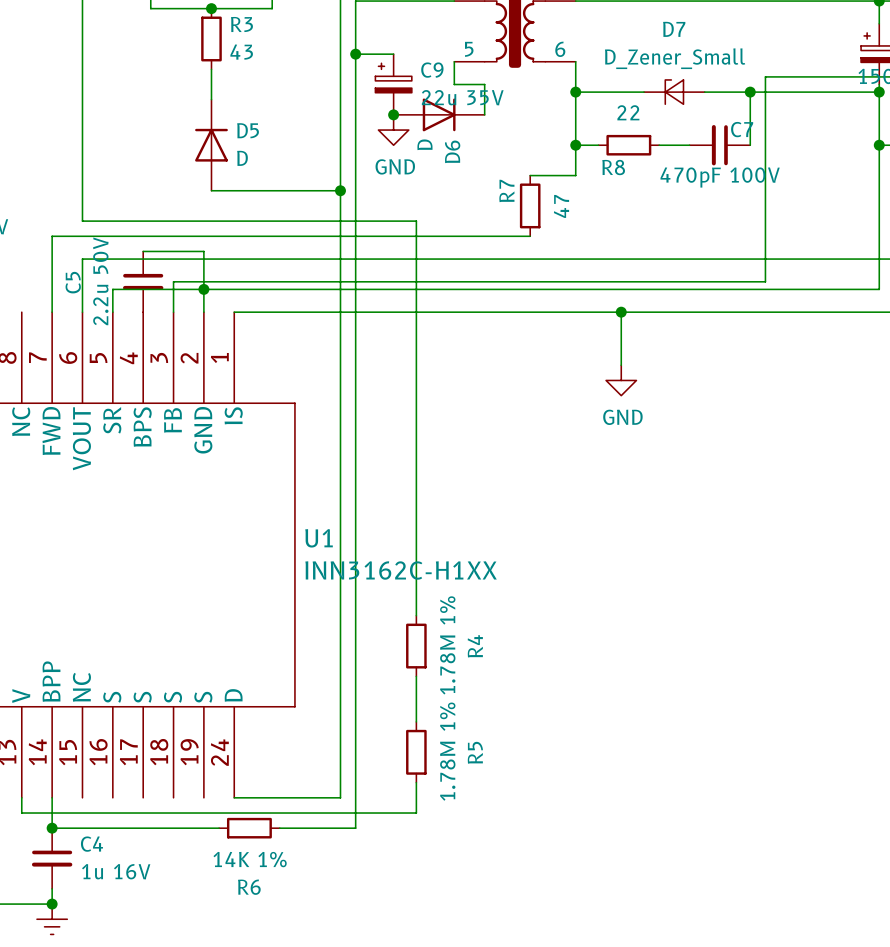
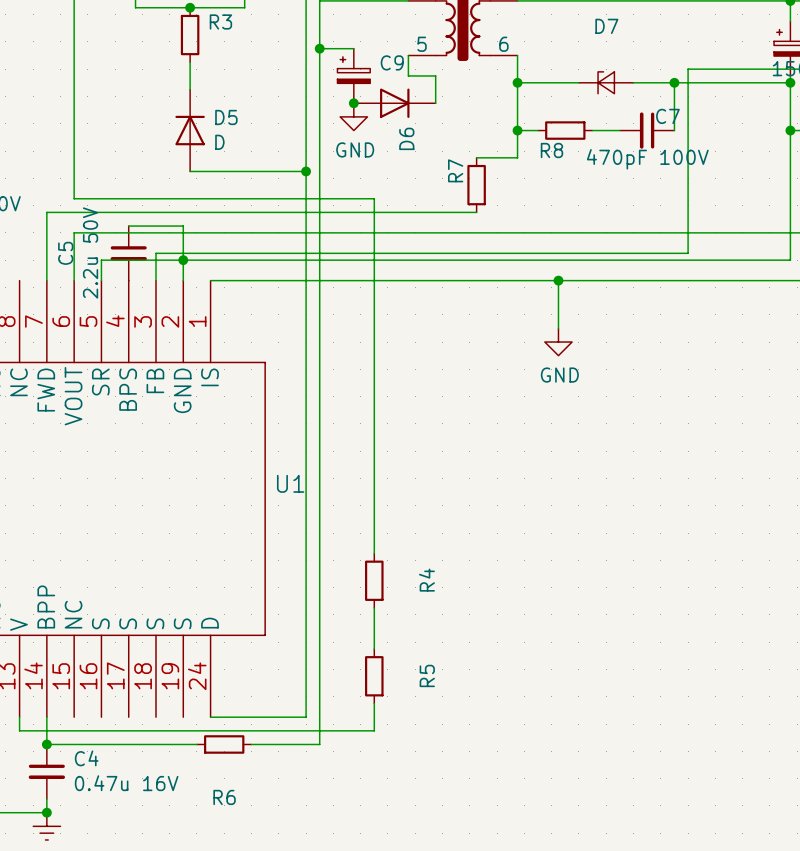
R3 value: 43 (241, 52) -> none
D7 value: D_Zener_Small (675, 58) -> none
C9 value: 22u 35V (462, 97) -> none
R8 value: 22 (628, 112) -> none
D6 value: D (424, 144) -> none
R7 value: 47 (561, 206) -> none
U1 value: INN3162C-H1XX (401, 570) -> none
R4 value: 1.78M 1% (447, 645) -> none
R5 value: 1.78M 1% (447, 751) -> none
R6 value: 14K 1% (250, 859) -> none
C4 value: 1u 16V (116, 871) -> 0.47u 16V (126, 783)

